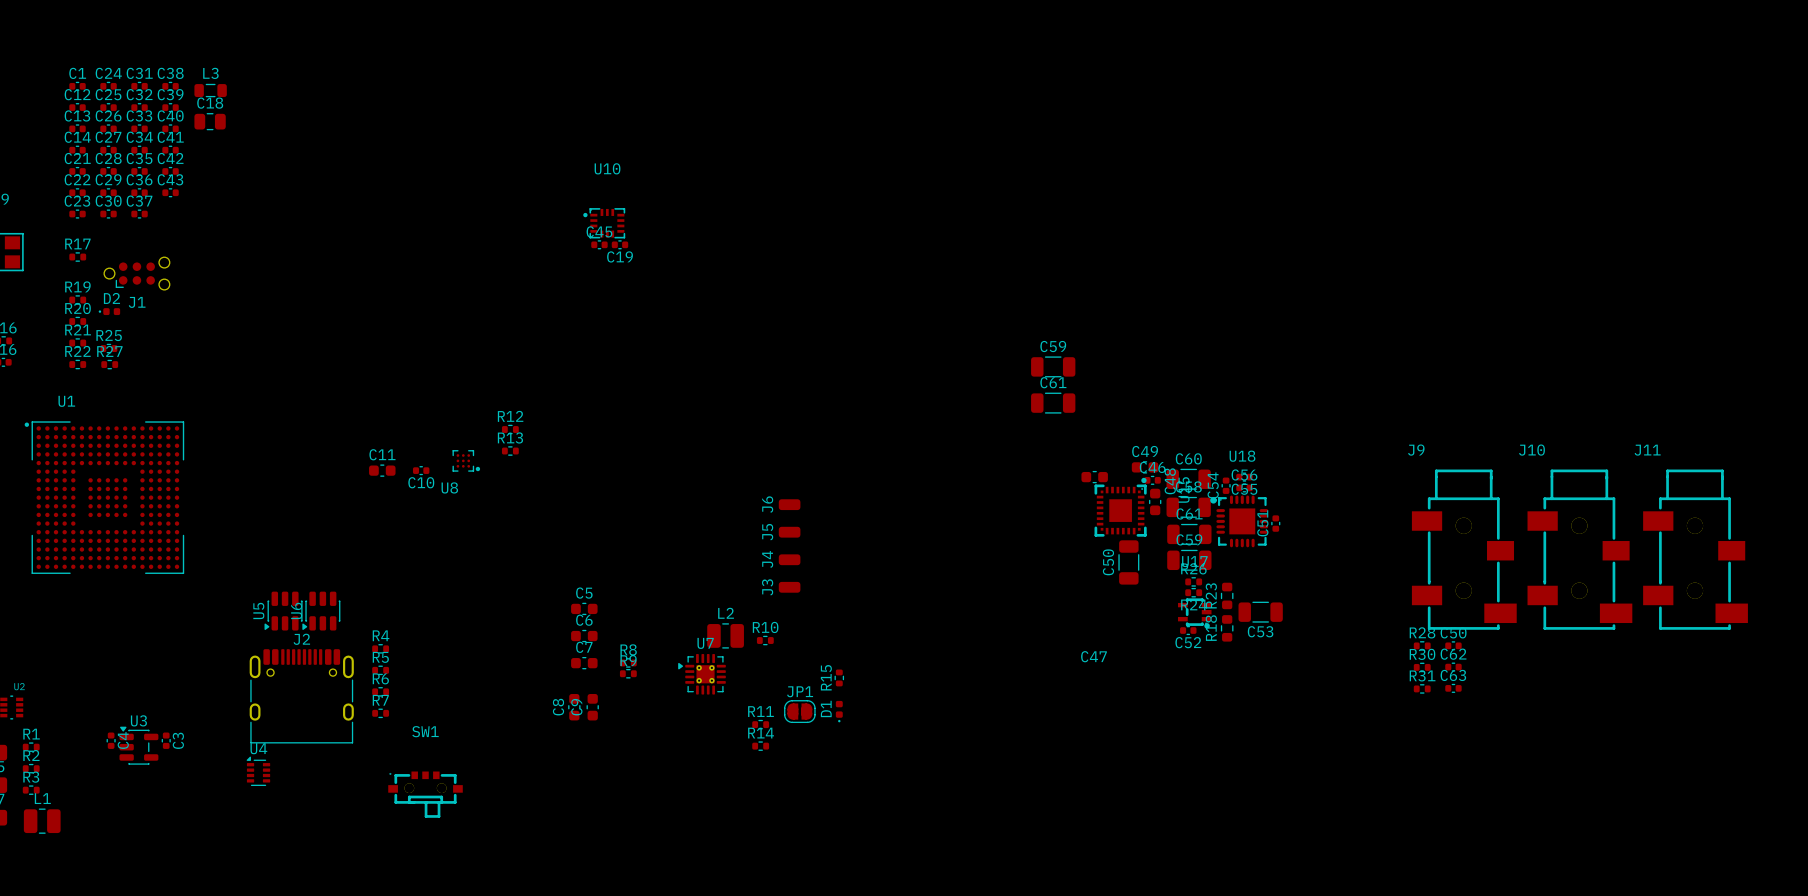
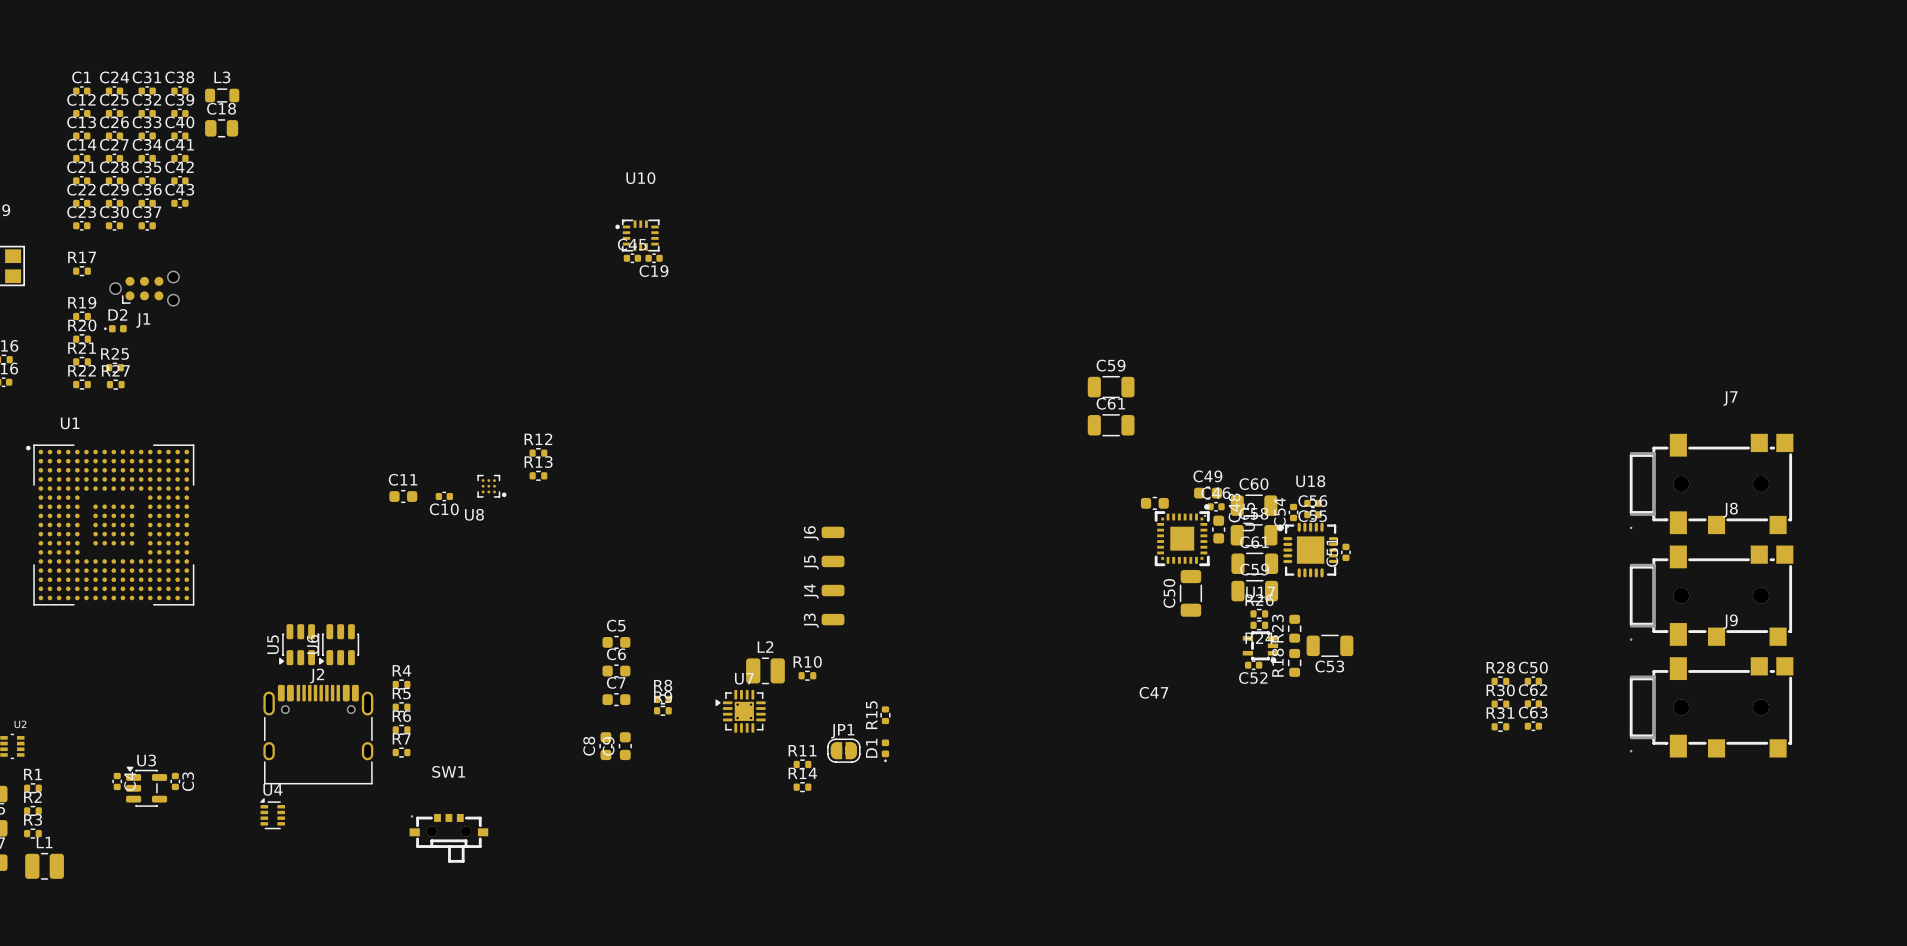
J9 name position: J9 (1416, 450) -> J9 (1730, 621)
J7: none -> (1711, 483)
J9 footprint: [1411, 469, 1517, 630] -> [1629, 657, 1794, 758]
J10: (1579, 549) -> none
J11: (1695, 549) -> none
J8: none -> (1711, 595)

